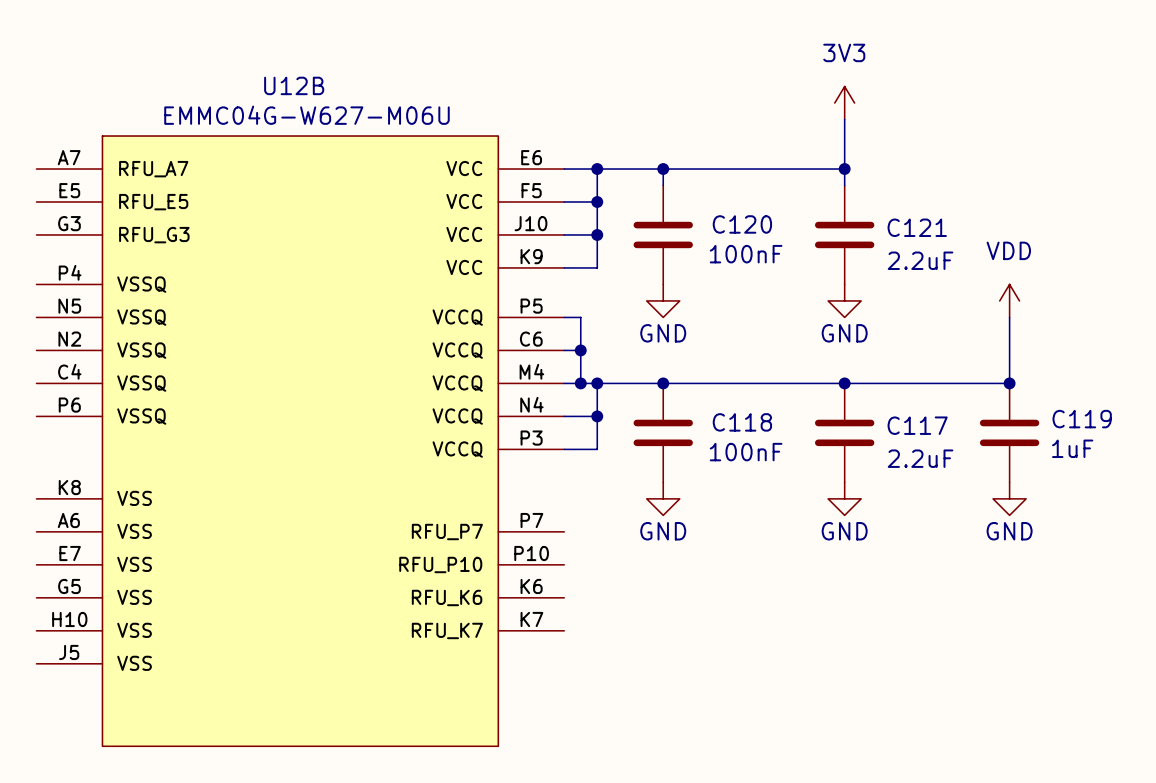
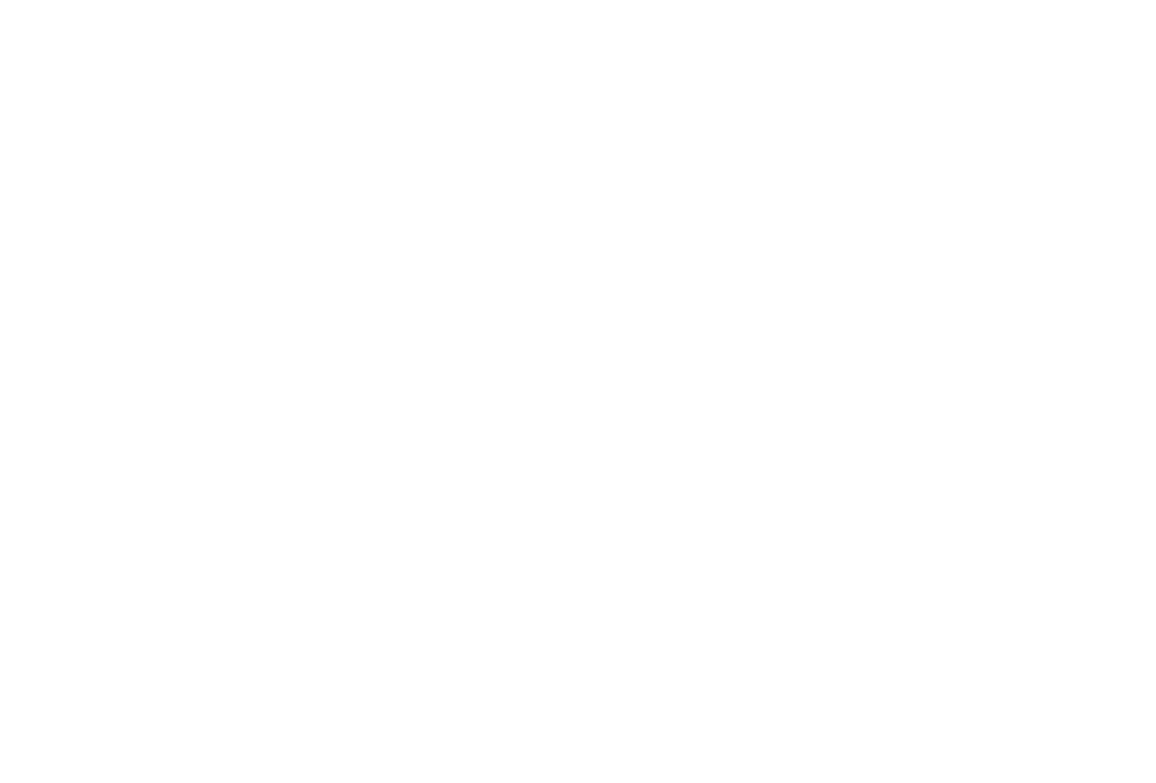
power symbol: 3V3 (844, 103) -> none
wire: (844, 119) (844, 185) -> none
wire: (564, 169) (844, 169) -> none
wire: (597, 169) (597, 267) (564, 267) -> none
junction: (597, 169) -> none
wire: (663, 169) (663, 185) -> none
junction: (663, 169) -> none
junction: (844, 169) -> none
wire: (564, 201) (597, 201) -> none
junction: (597, 201) -> none
wire: (564, 234) (597, 234) -> none
junction: (597, 234) -> none
C120: 100nF (663, 234) -> none
C121: 2.2uF (844, 234) -> none
power symbol: GND (663, 300) -> none
power symbol: GND (844, 300) -> none
power symbol: VDD (1009, 300) -> none
wire: (564, 317) (580, 317) (580, 383) -> none
wire: (1009, 317) (1009, 383) (564, 383) -> none
wire: (564, 350) (580, 350) -> none
junction: (580, 350) -> none
junction: (580, 383) -> none
wire: (597, 383) (597, 449) (564, 449) -> none
junction: (597, 383) -> none
junction: (663, 383) -> none
junction: (844, 383) -> none
junction: (1009, 383) -> none
wire: (564, 416) (597, 416) -> none
junction: (597, 416) -> none
C118: 100nF (663, 432) -> none
C117: 2.2uF (844, 432) -> none
C119: 1uF (1009, 432) -> none
U12B: EMMC04G-W627-M06U (300, 441) -> none
power symbol: GND (663, 498) -> none
power symbol: GND (844, 498) -> none
power symbol: GND (1009, 498) -> none

